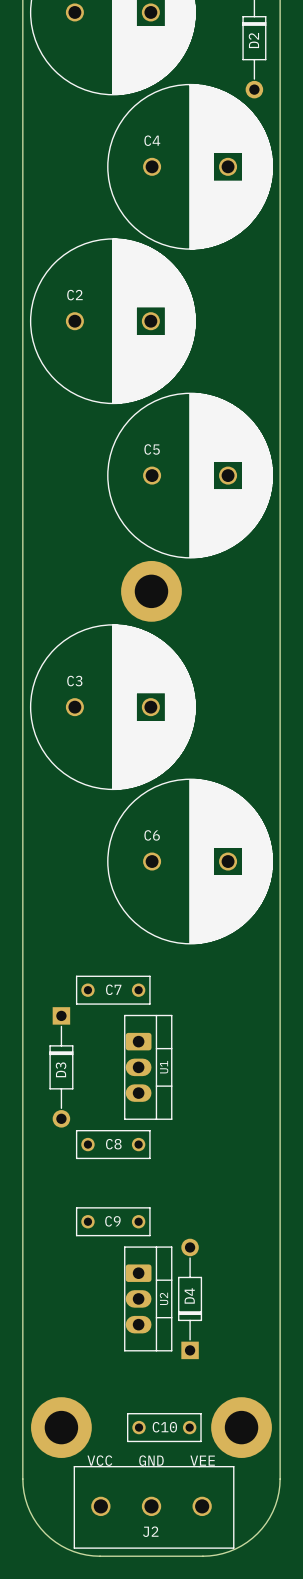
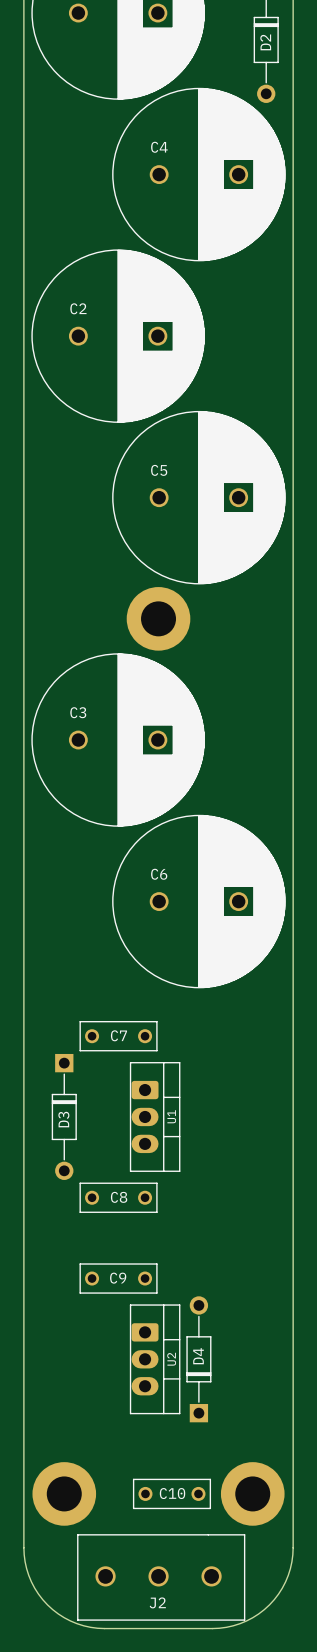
text: VCC (99, 1460) -> none
text: GND (151, 1460) -> none
text: VEE (202, 1460) -> none

